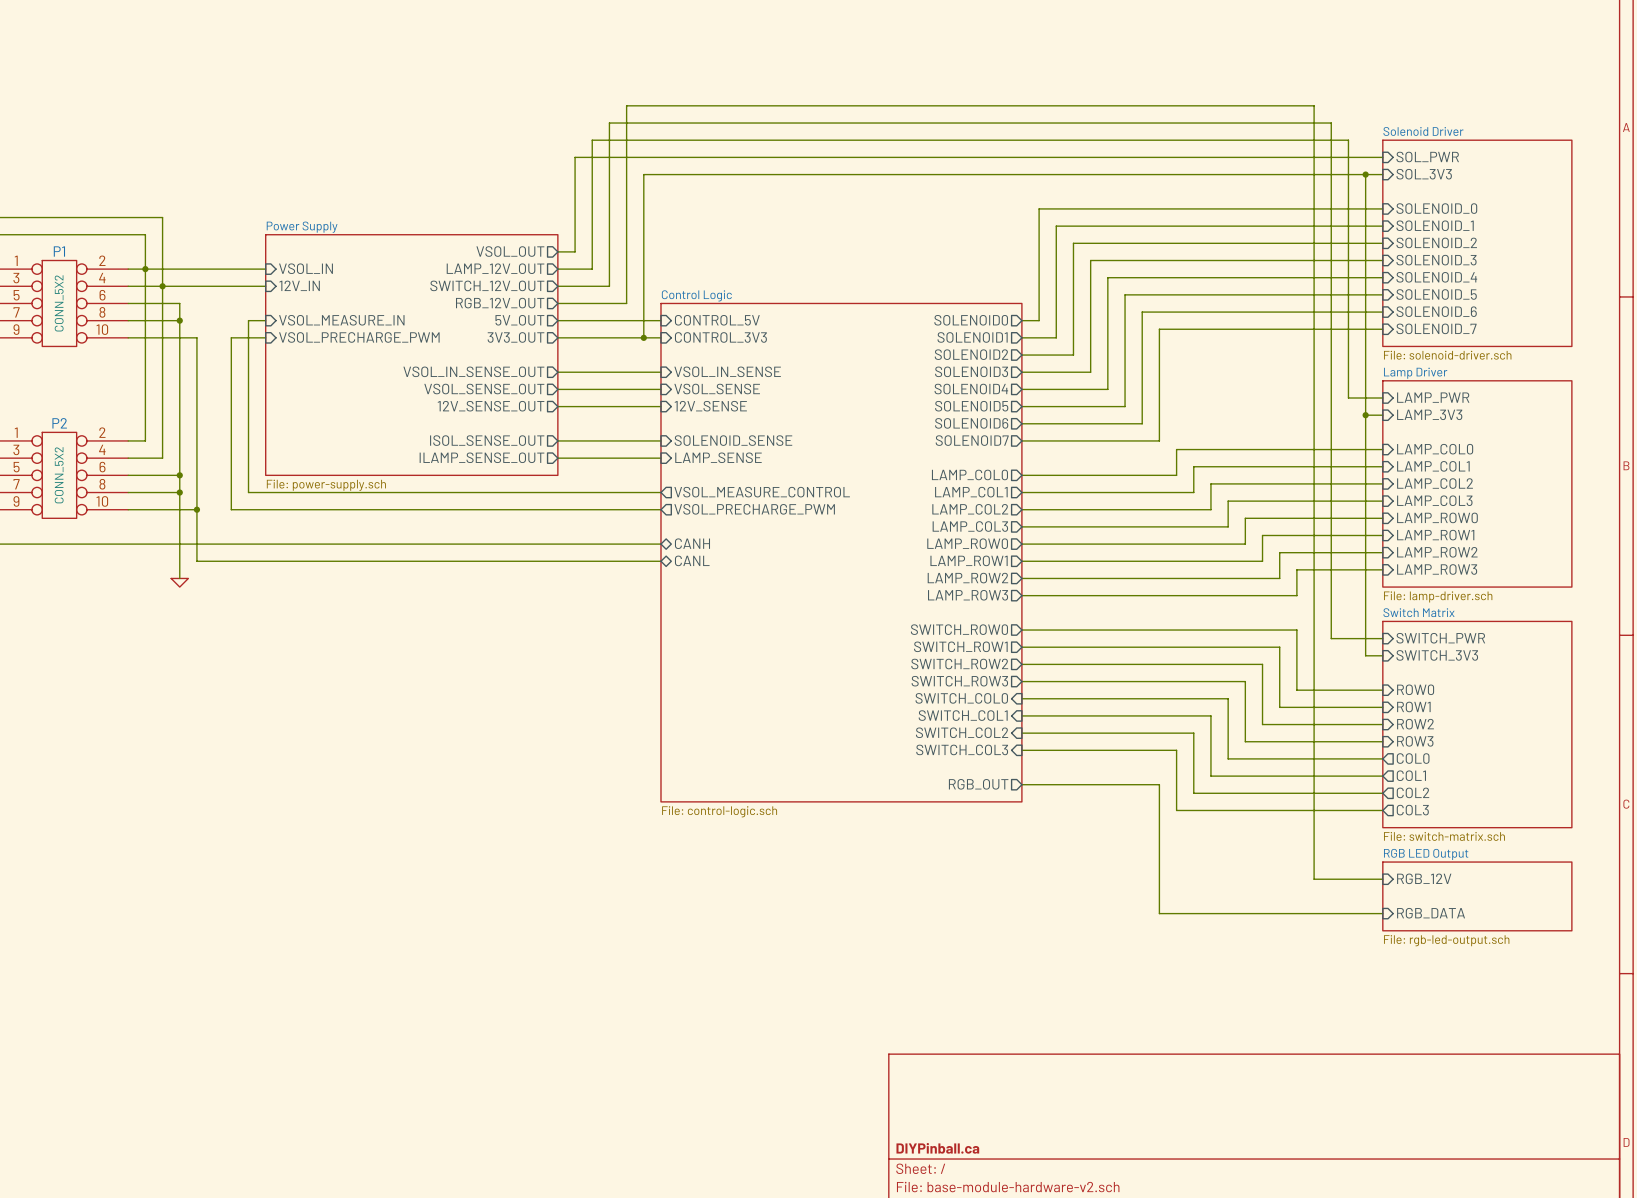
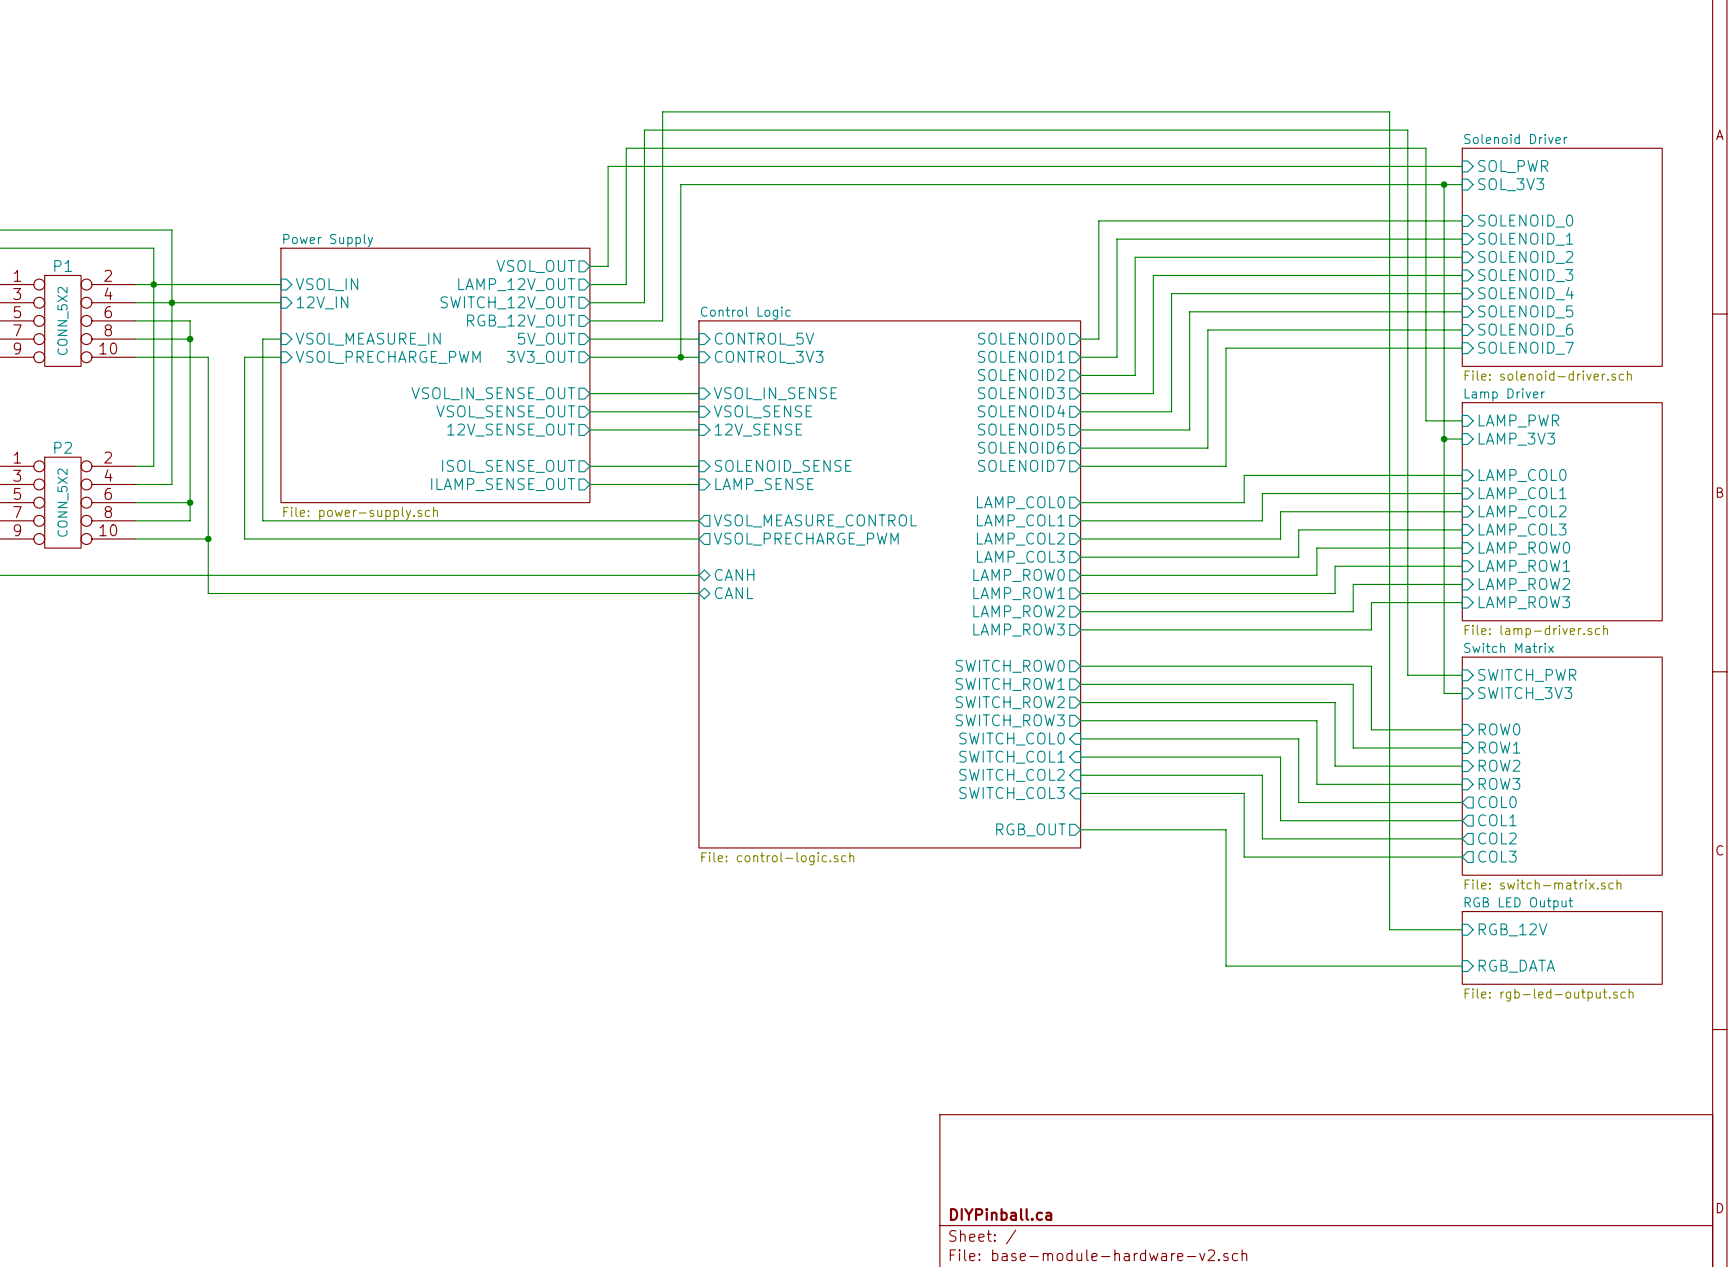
wire: (179, 492) (179, 578) -> none
junction: (179, 492) -> none
power symbol: (179, 582) -> none

